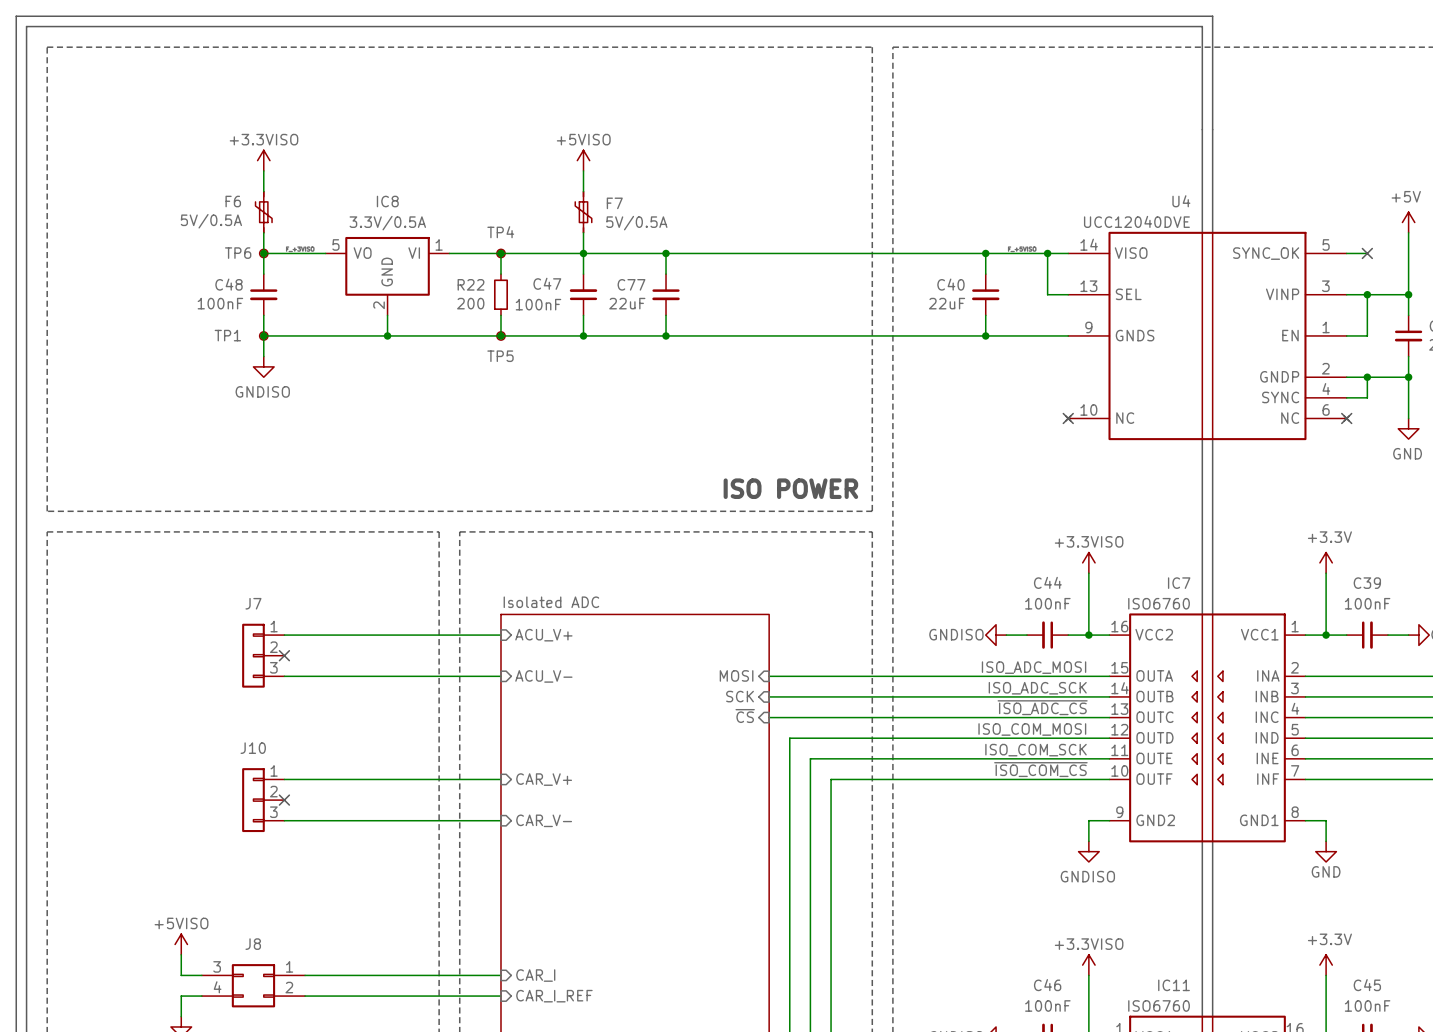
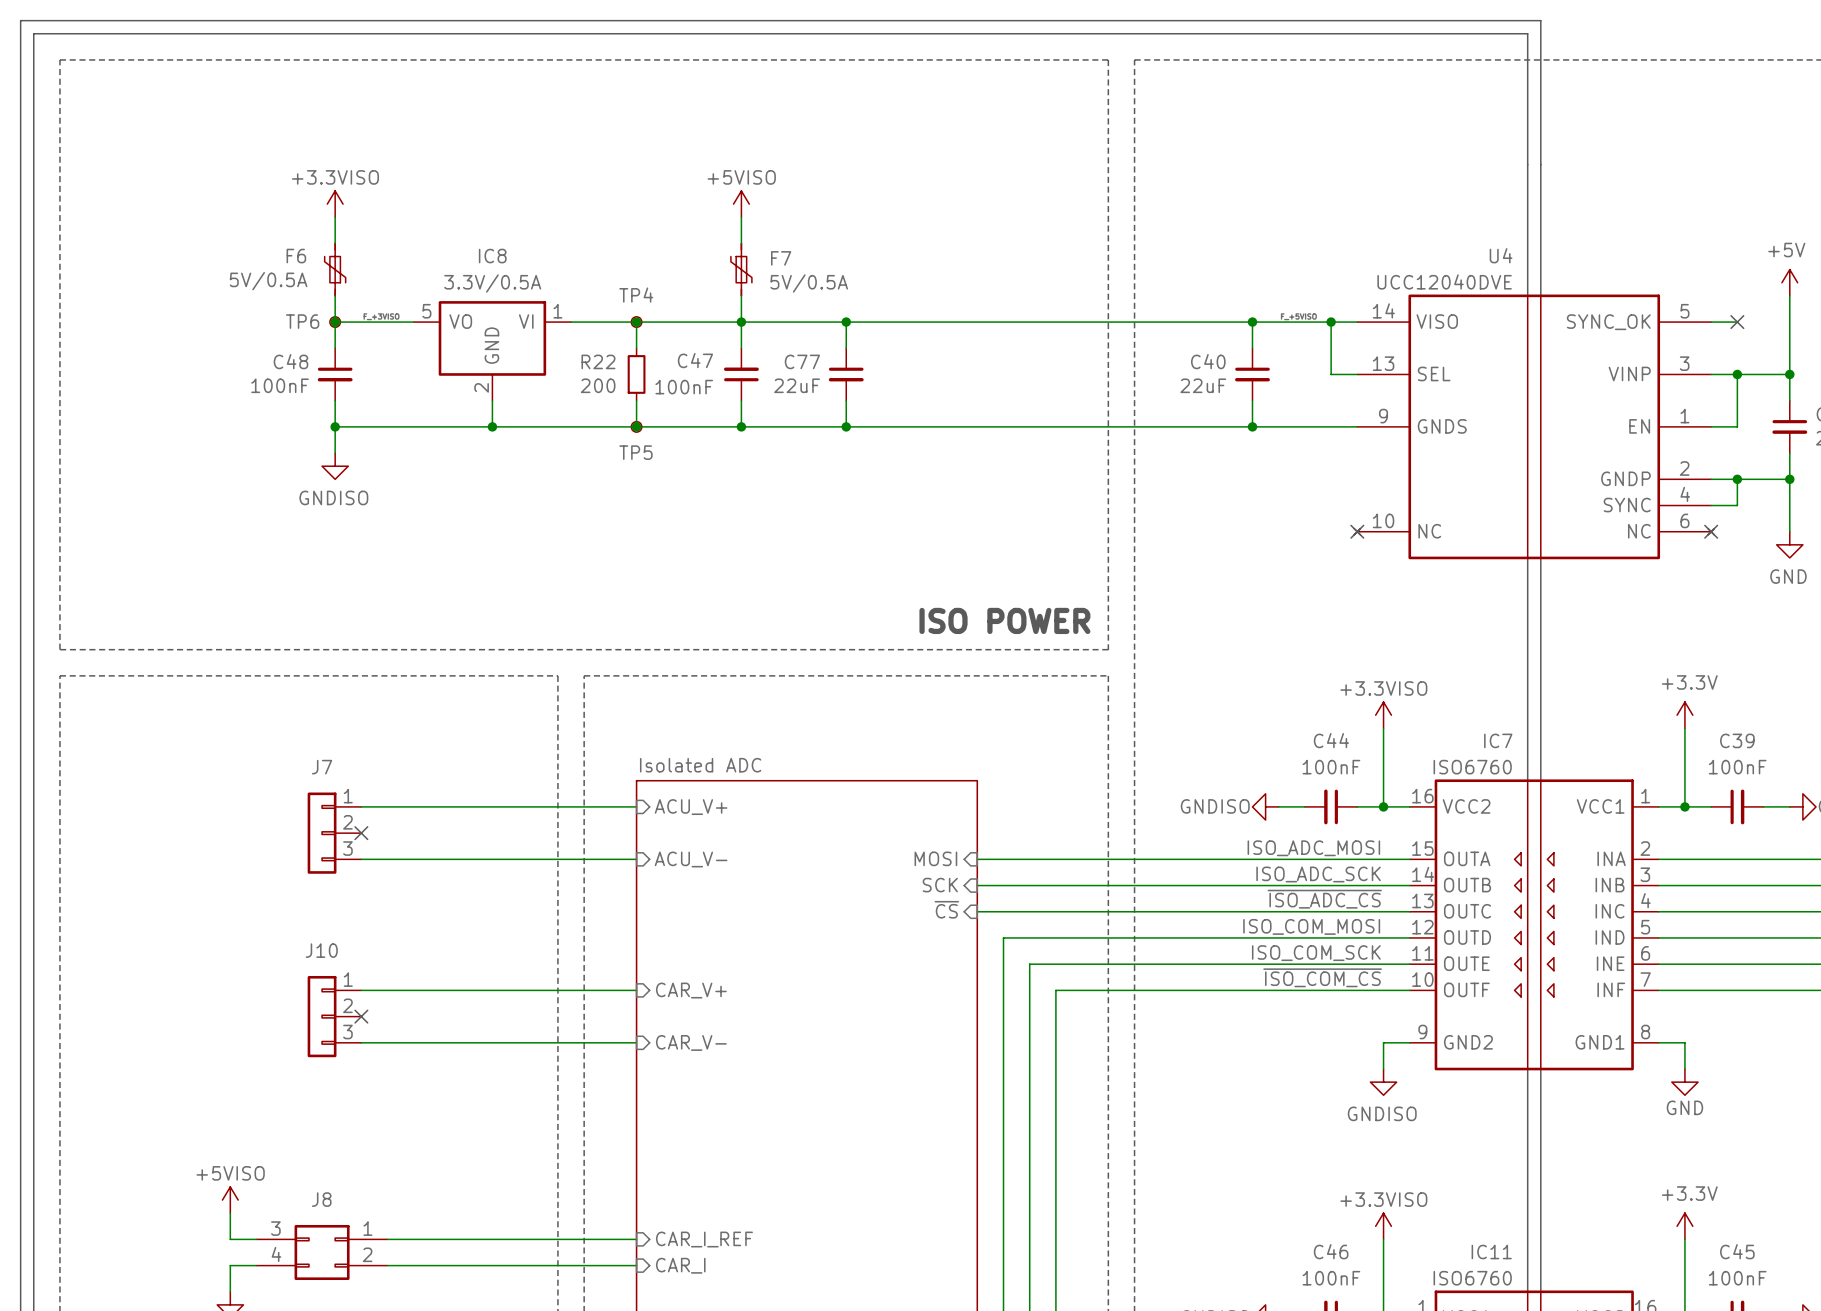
TP1: (263, 335) -> none
sheet pin: CAR_I (535, 975) -> CAR_I_REF (704, 1239)
sheet pin: CAR_I_REF (554, 996) -> CAR_I (680, 1265)

